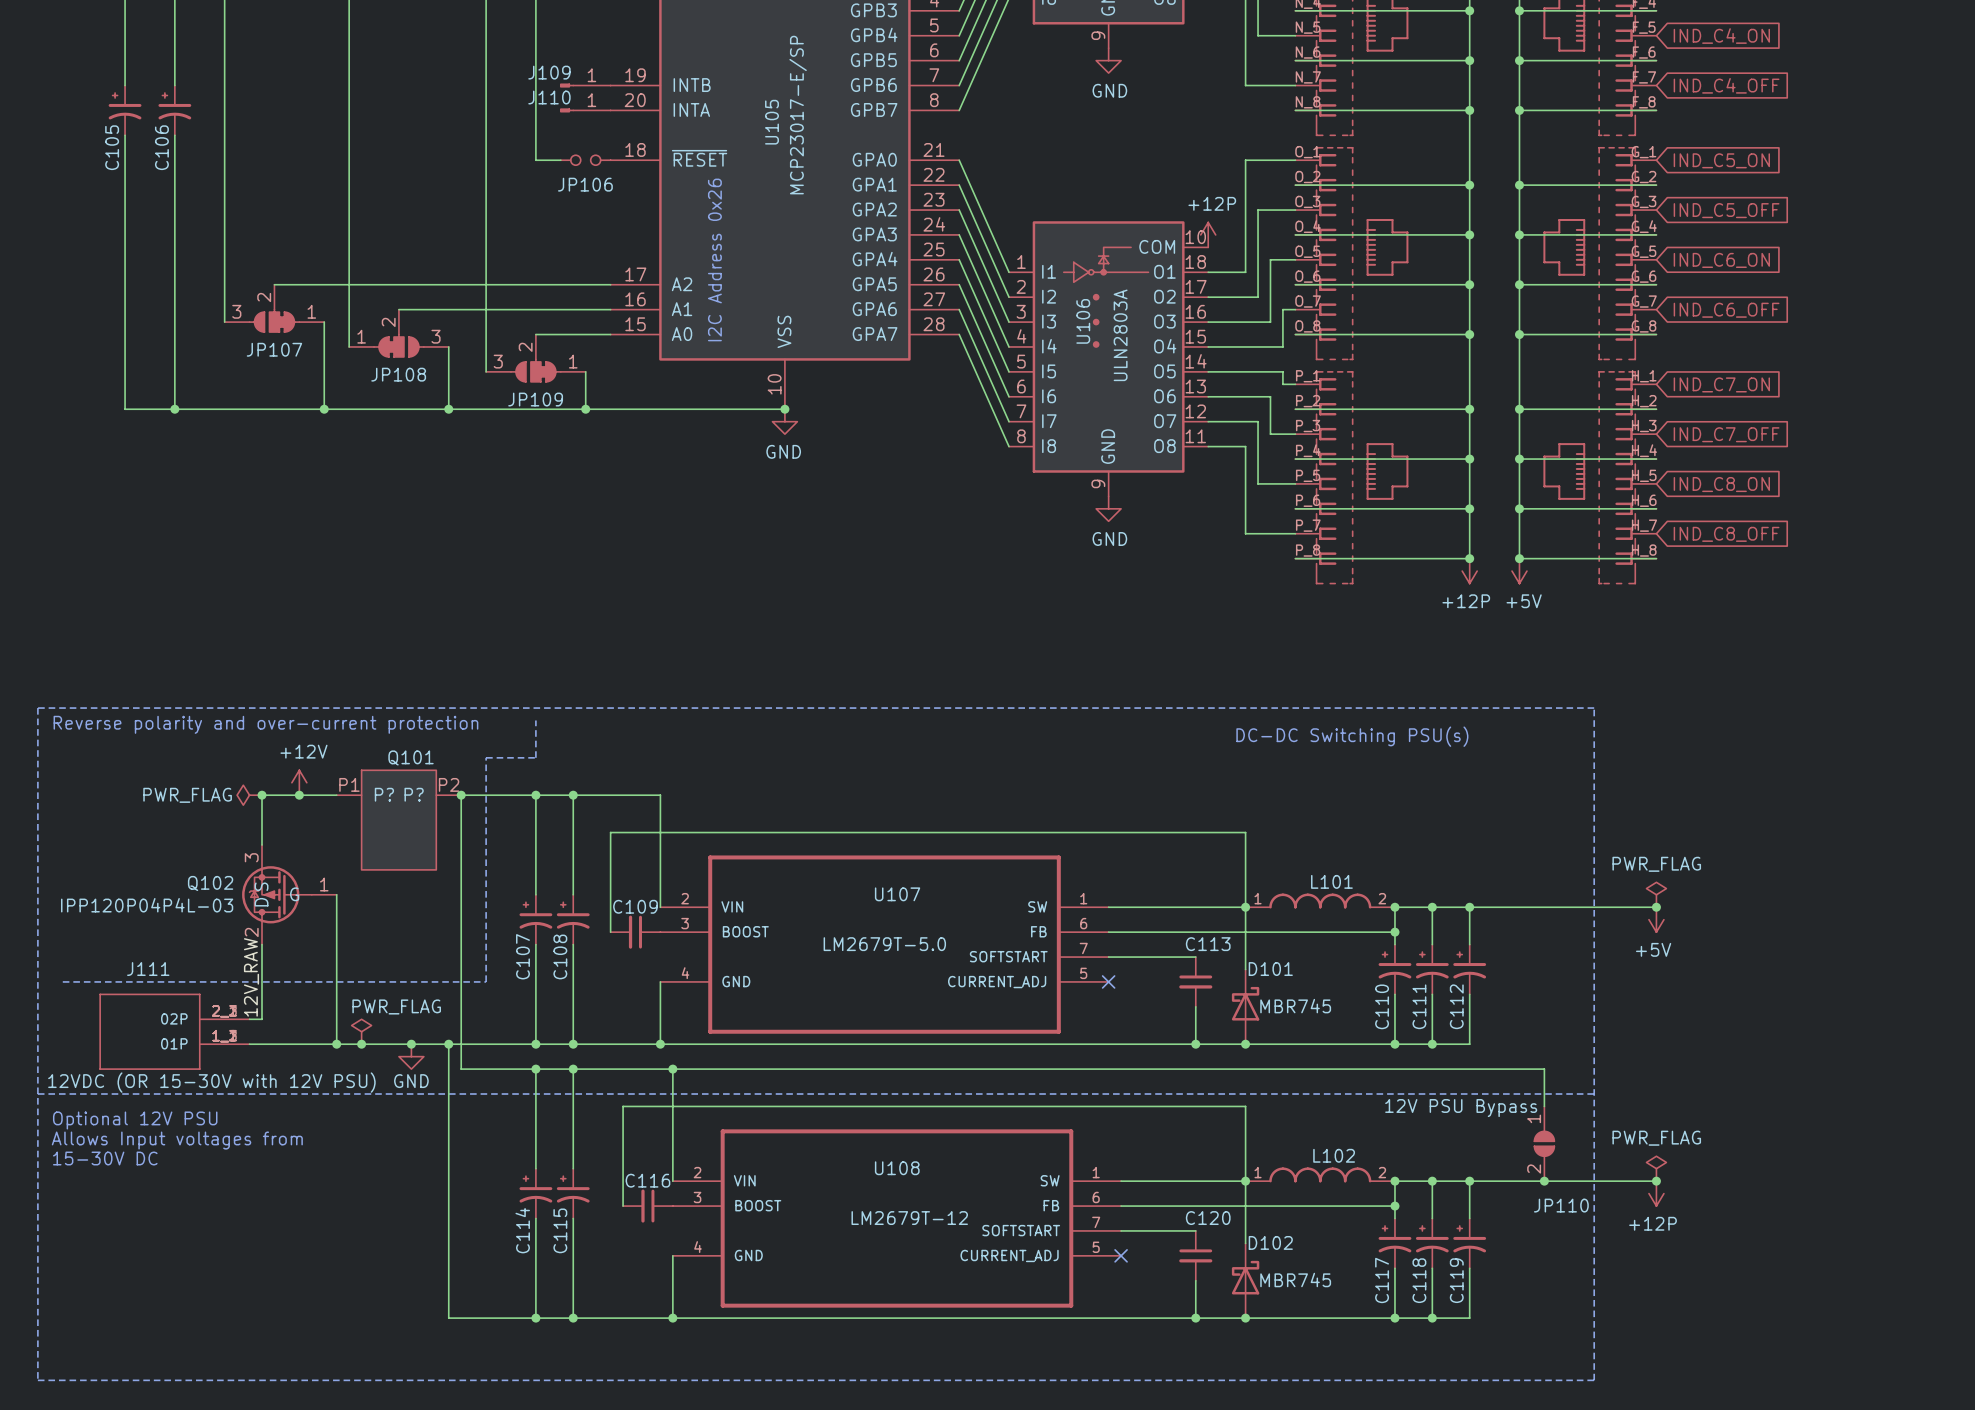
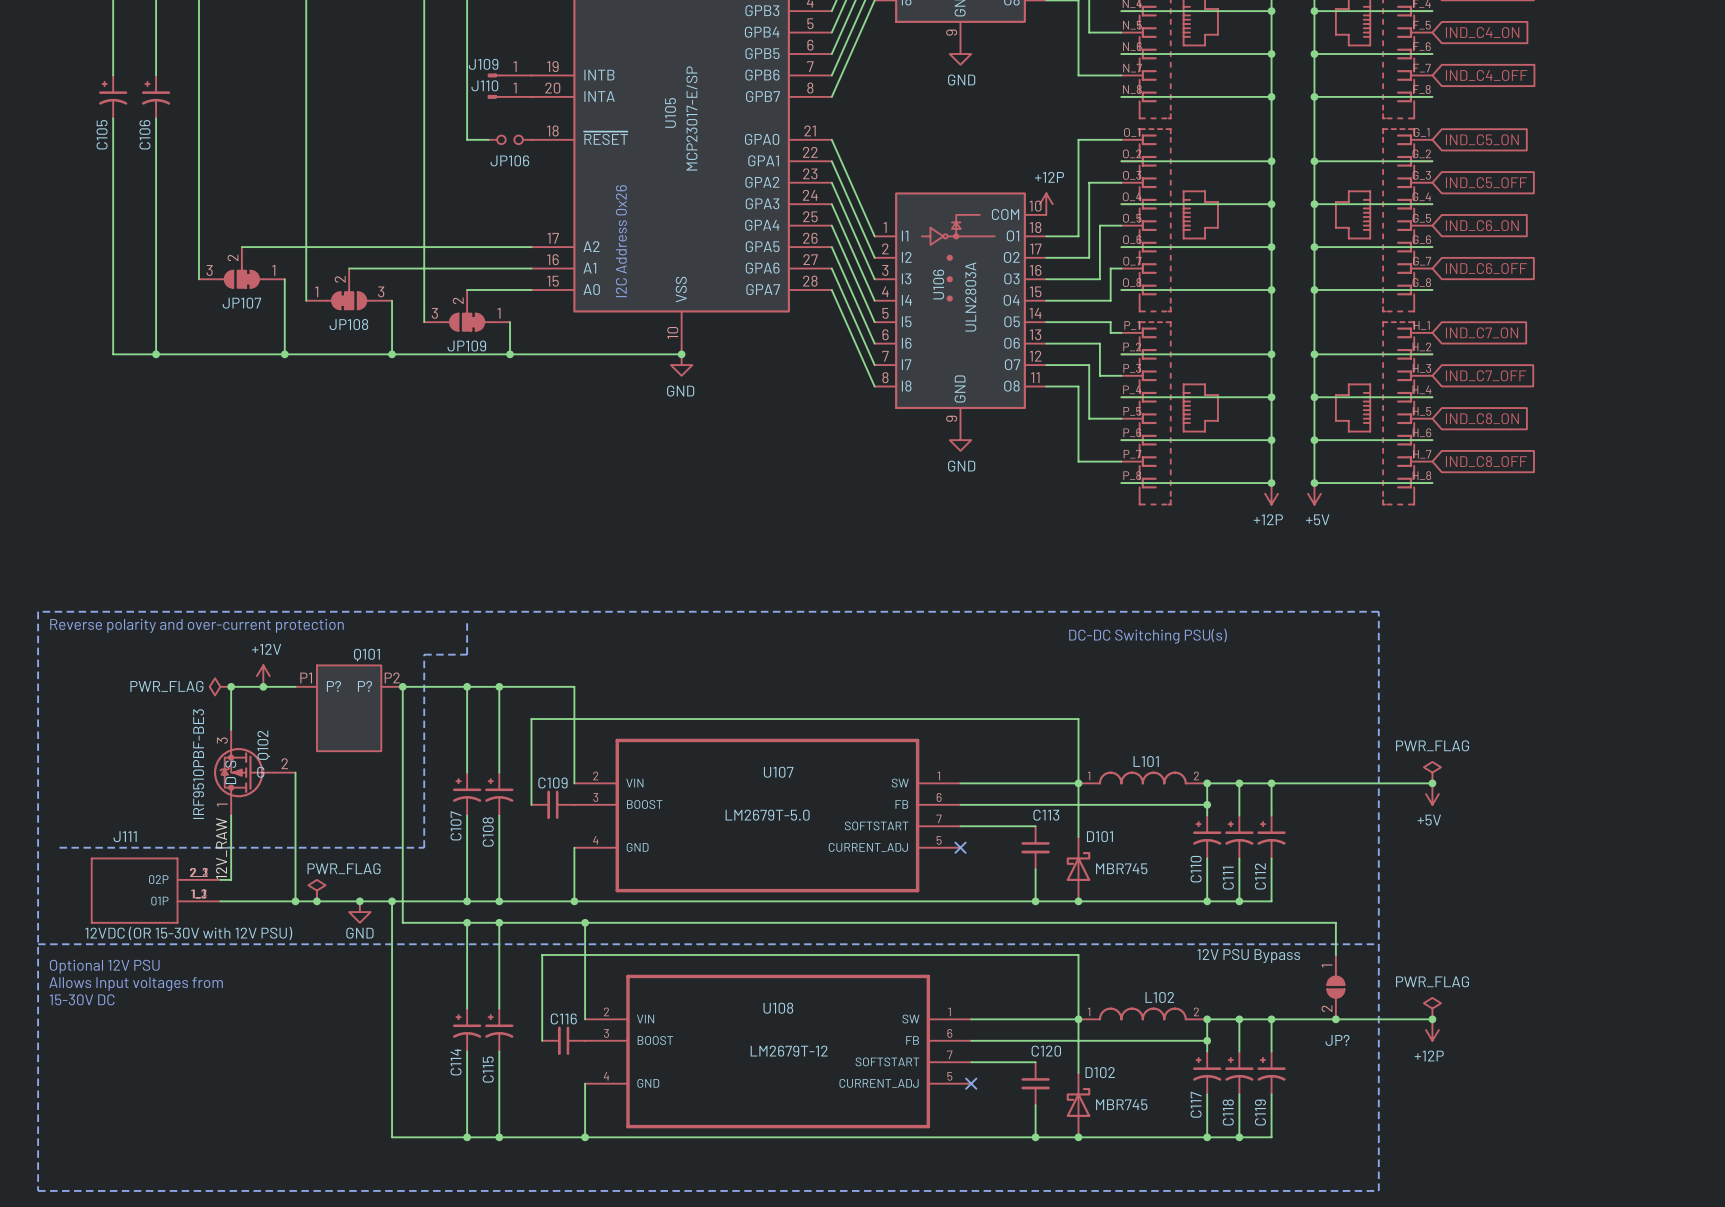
Q102 name rotation: 0° (210, 883) -> 90° counterclockwise (263, 745)
Q102 name position: Q102 (210, 883) -> Q102 (263, 745)
Q102 pin number: 1 (324, 884) -> 2 (284, 763)
Q102 value: IPP120P04P4L-03 (147, 905) -> IRF9510PBF-BE3 (198, 764)
Q102 pin number: 2 (251, 932) -> 1 (222, 805)
JP110 name: JP110 (1561, 1205) -> JP? (1337, 1040)

